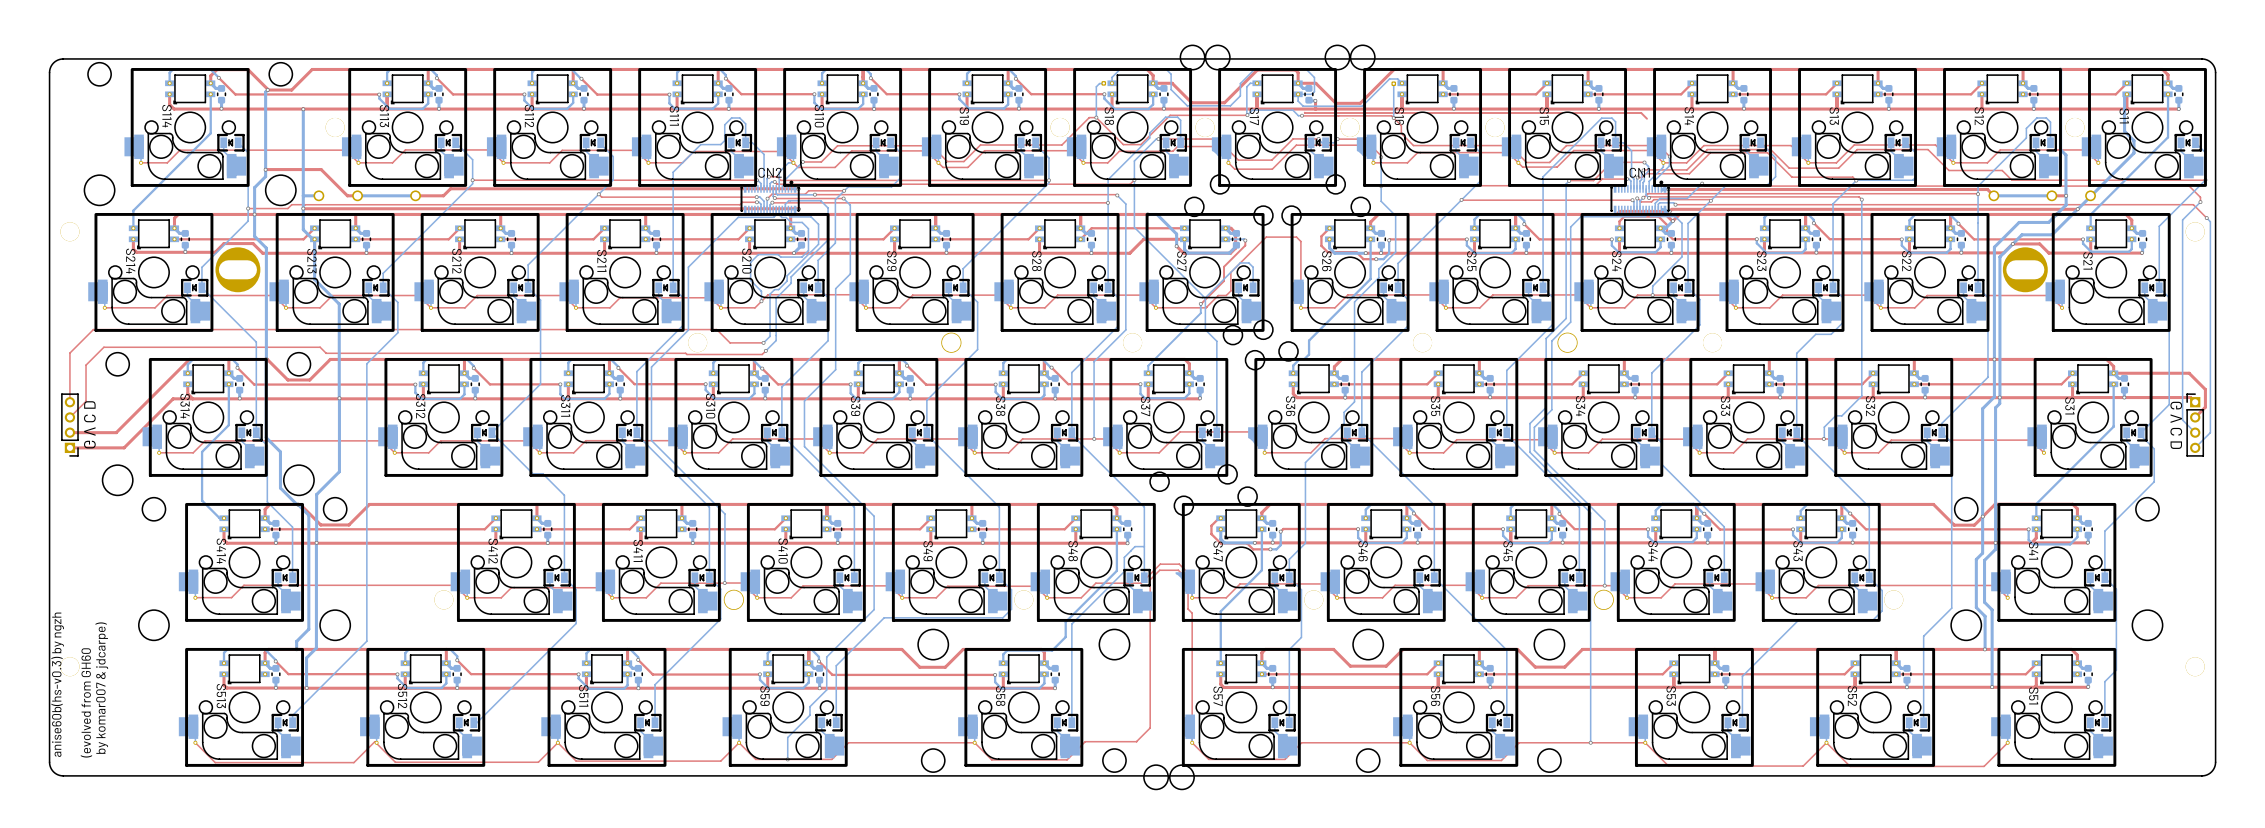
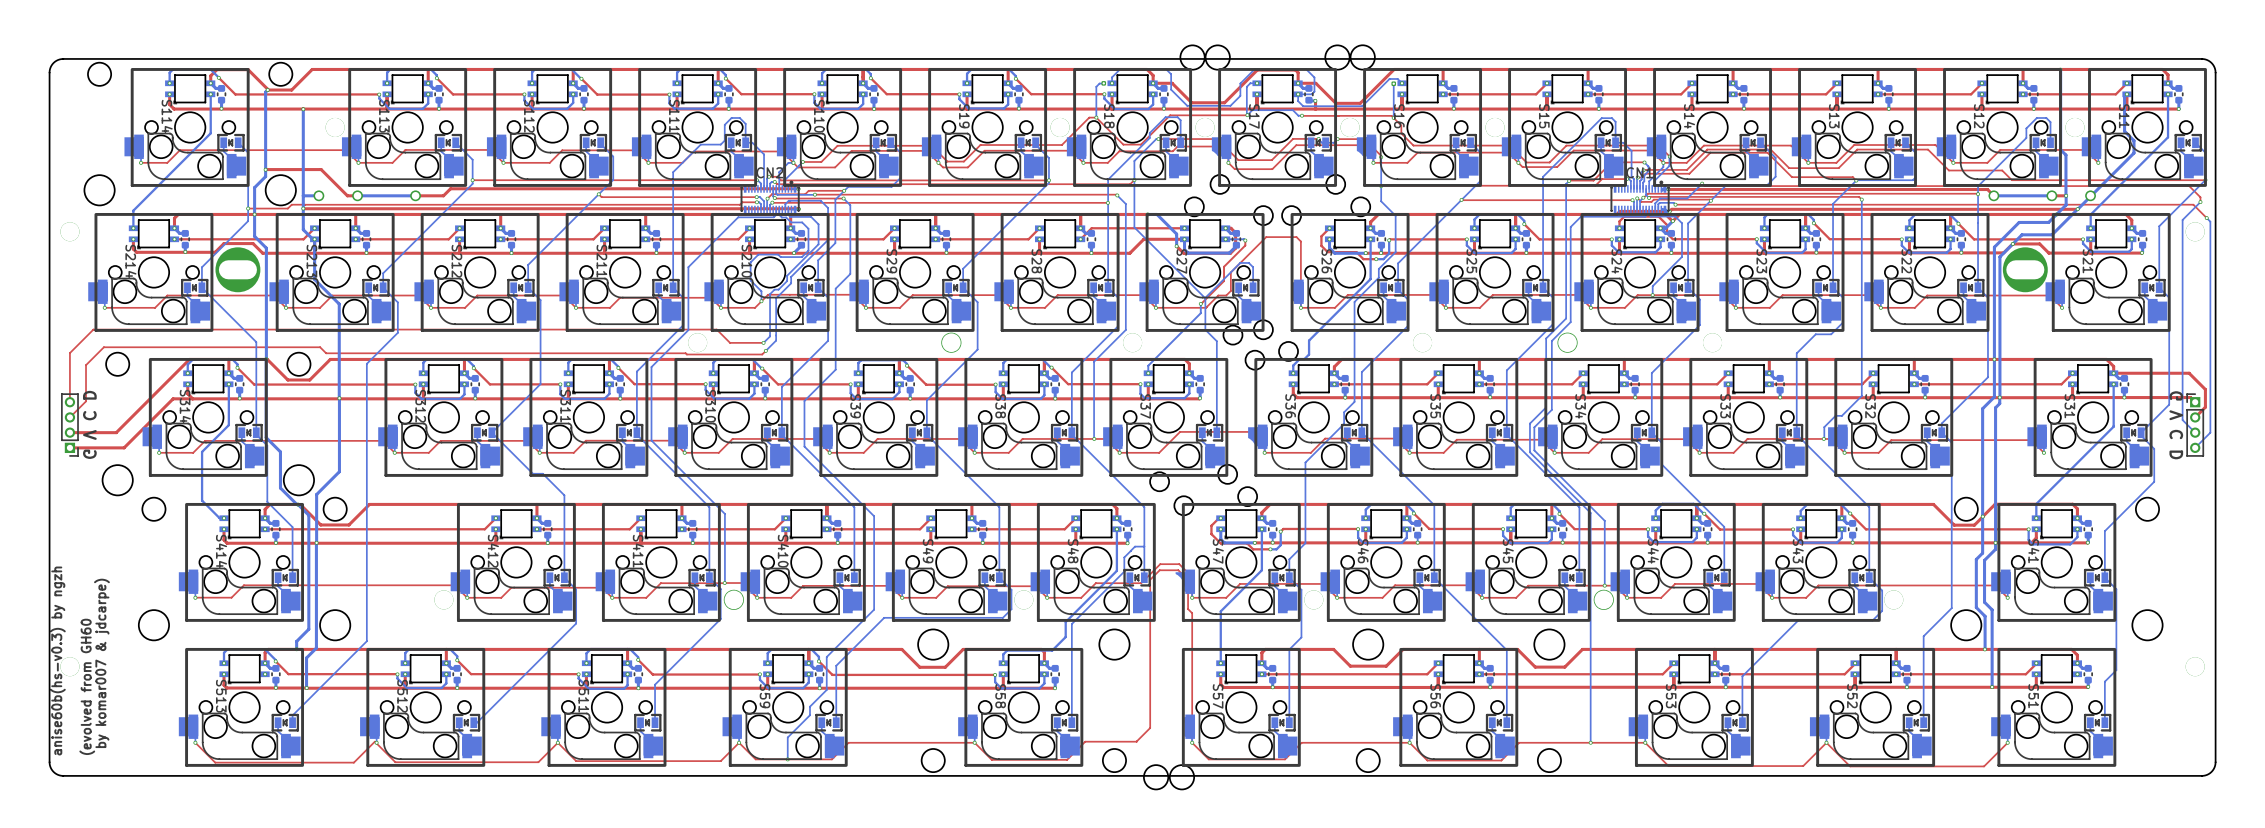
top track: (1304, 112) (1641, 113) (1646, 118) -> none

